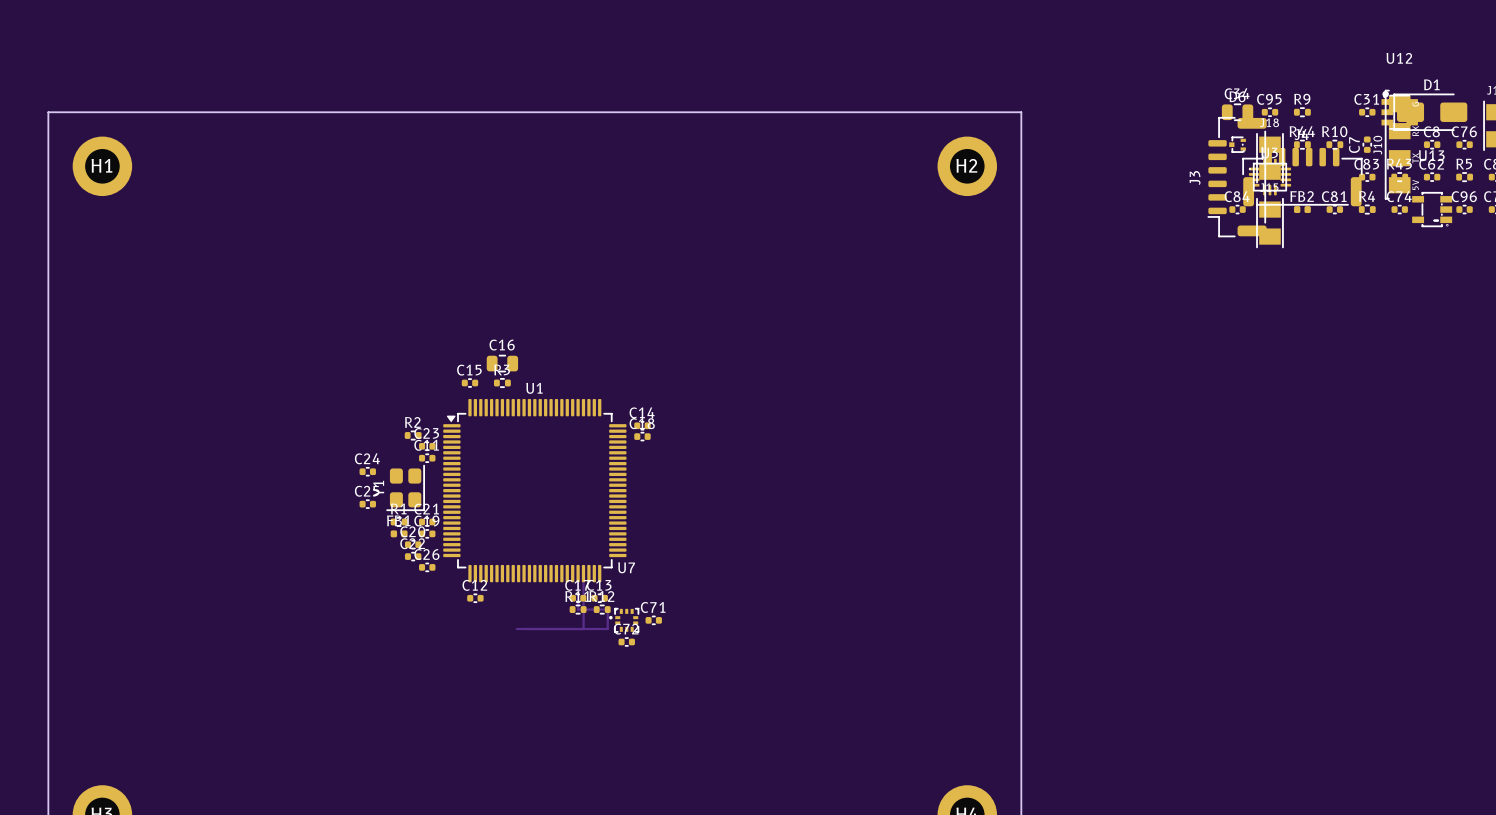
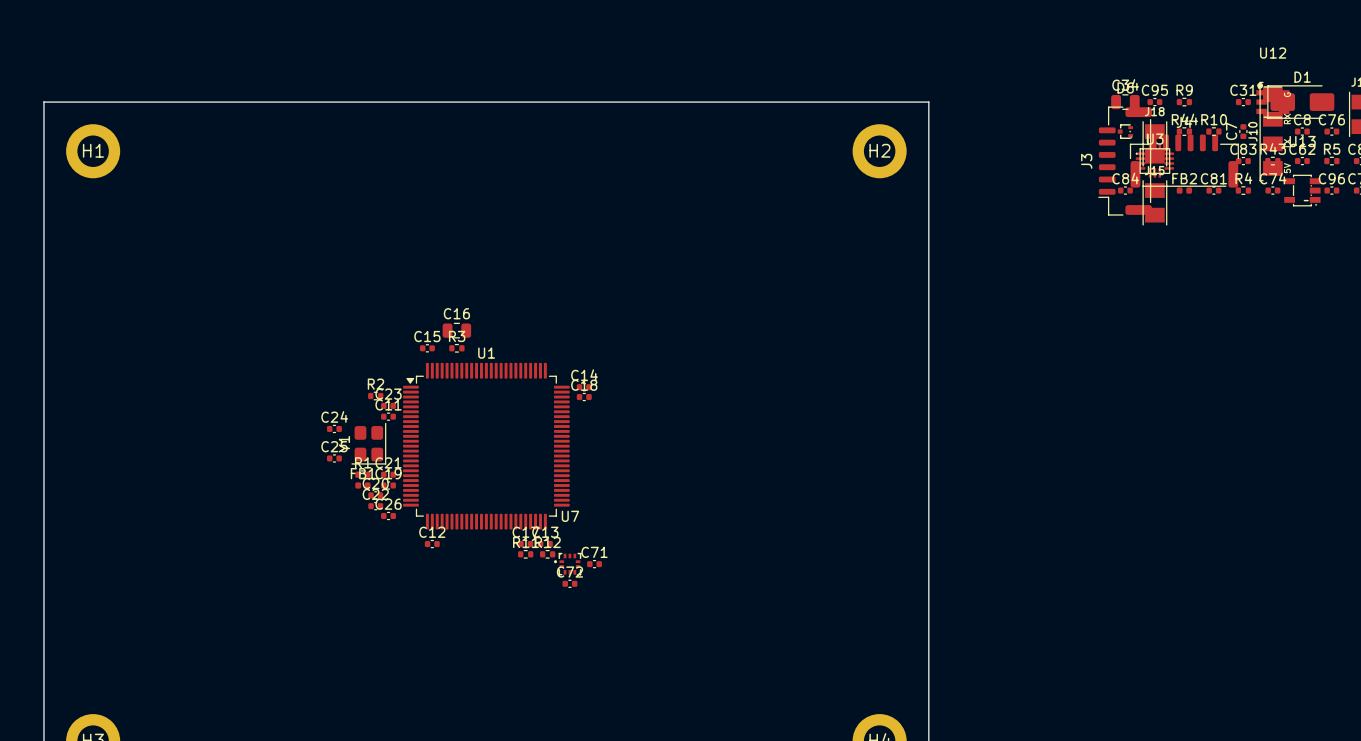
track: (578, 573) (578, 609) (607, 609) (607, 629) (516, 629) -> none
track: (583, 573) (583, 629) -> none

